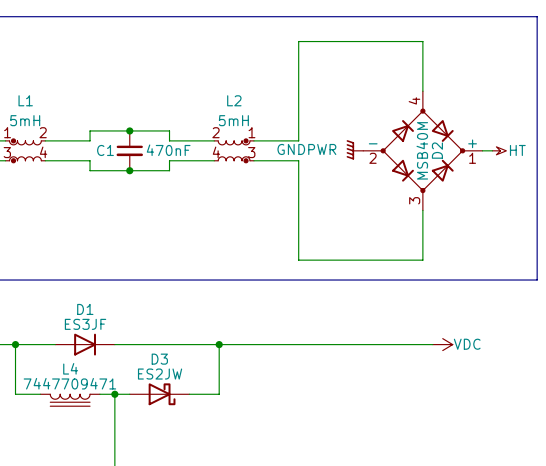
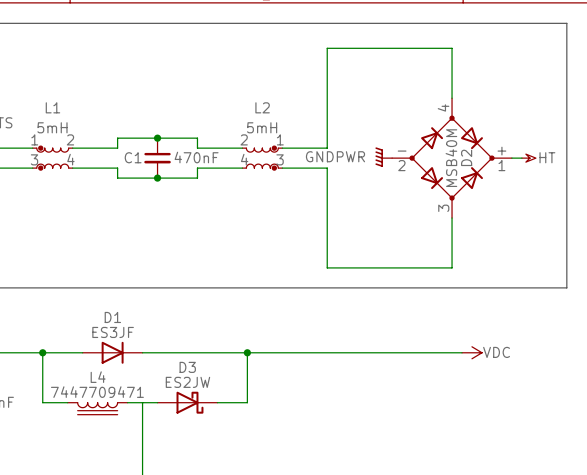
junction: (114, 394) -> none

